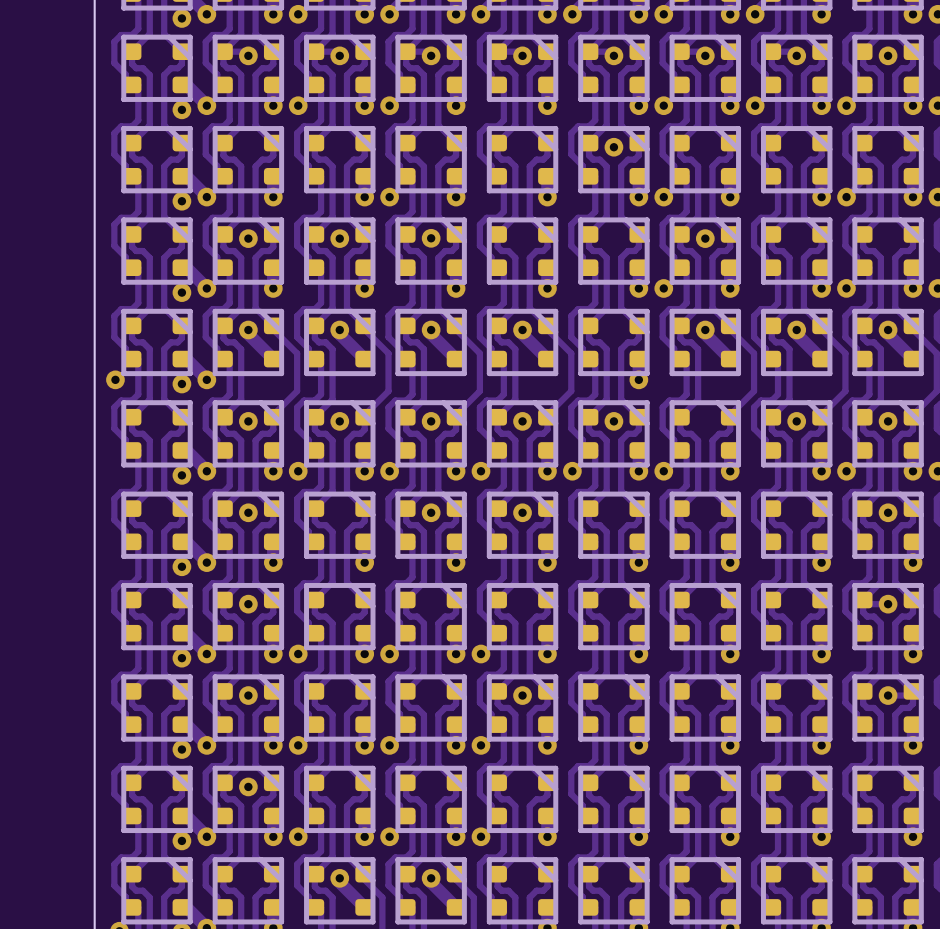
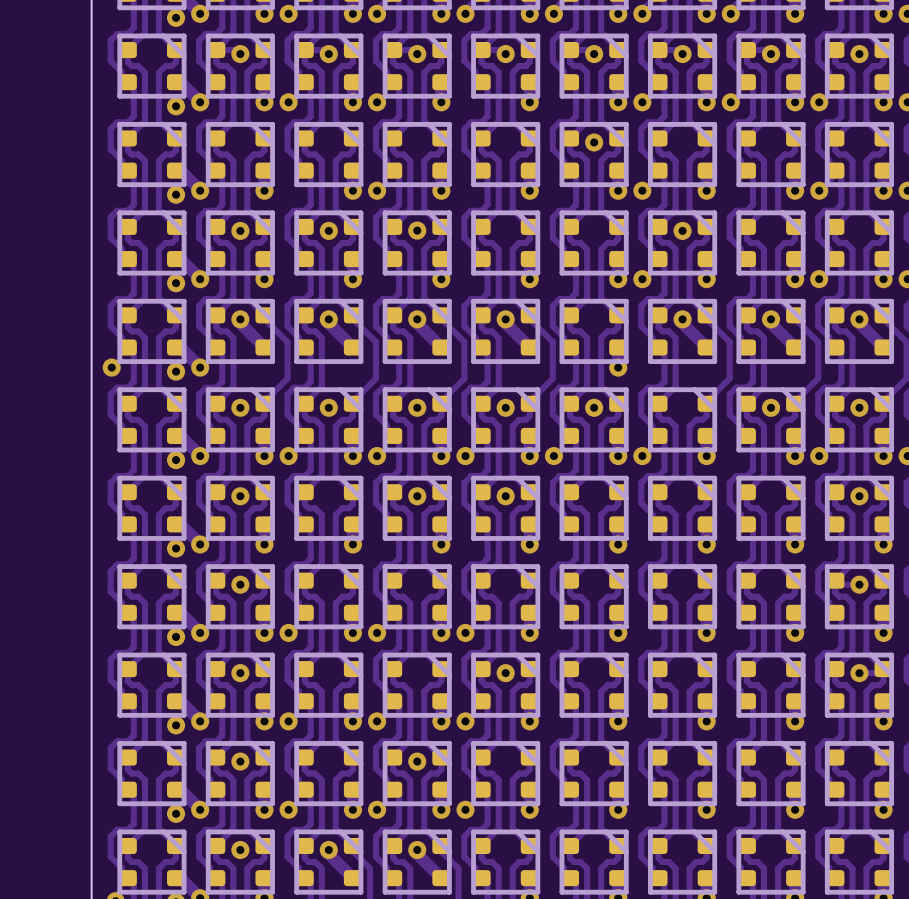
via: none -> (417, 761)
via: none -> (240, 850)

